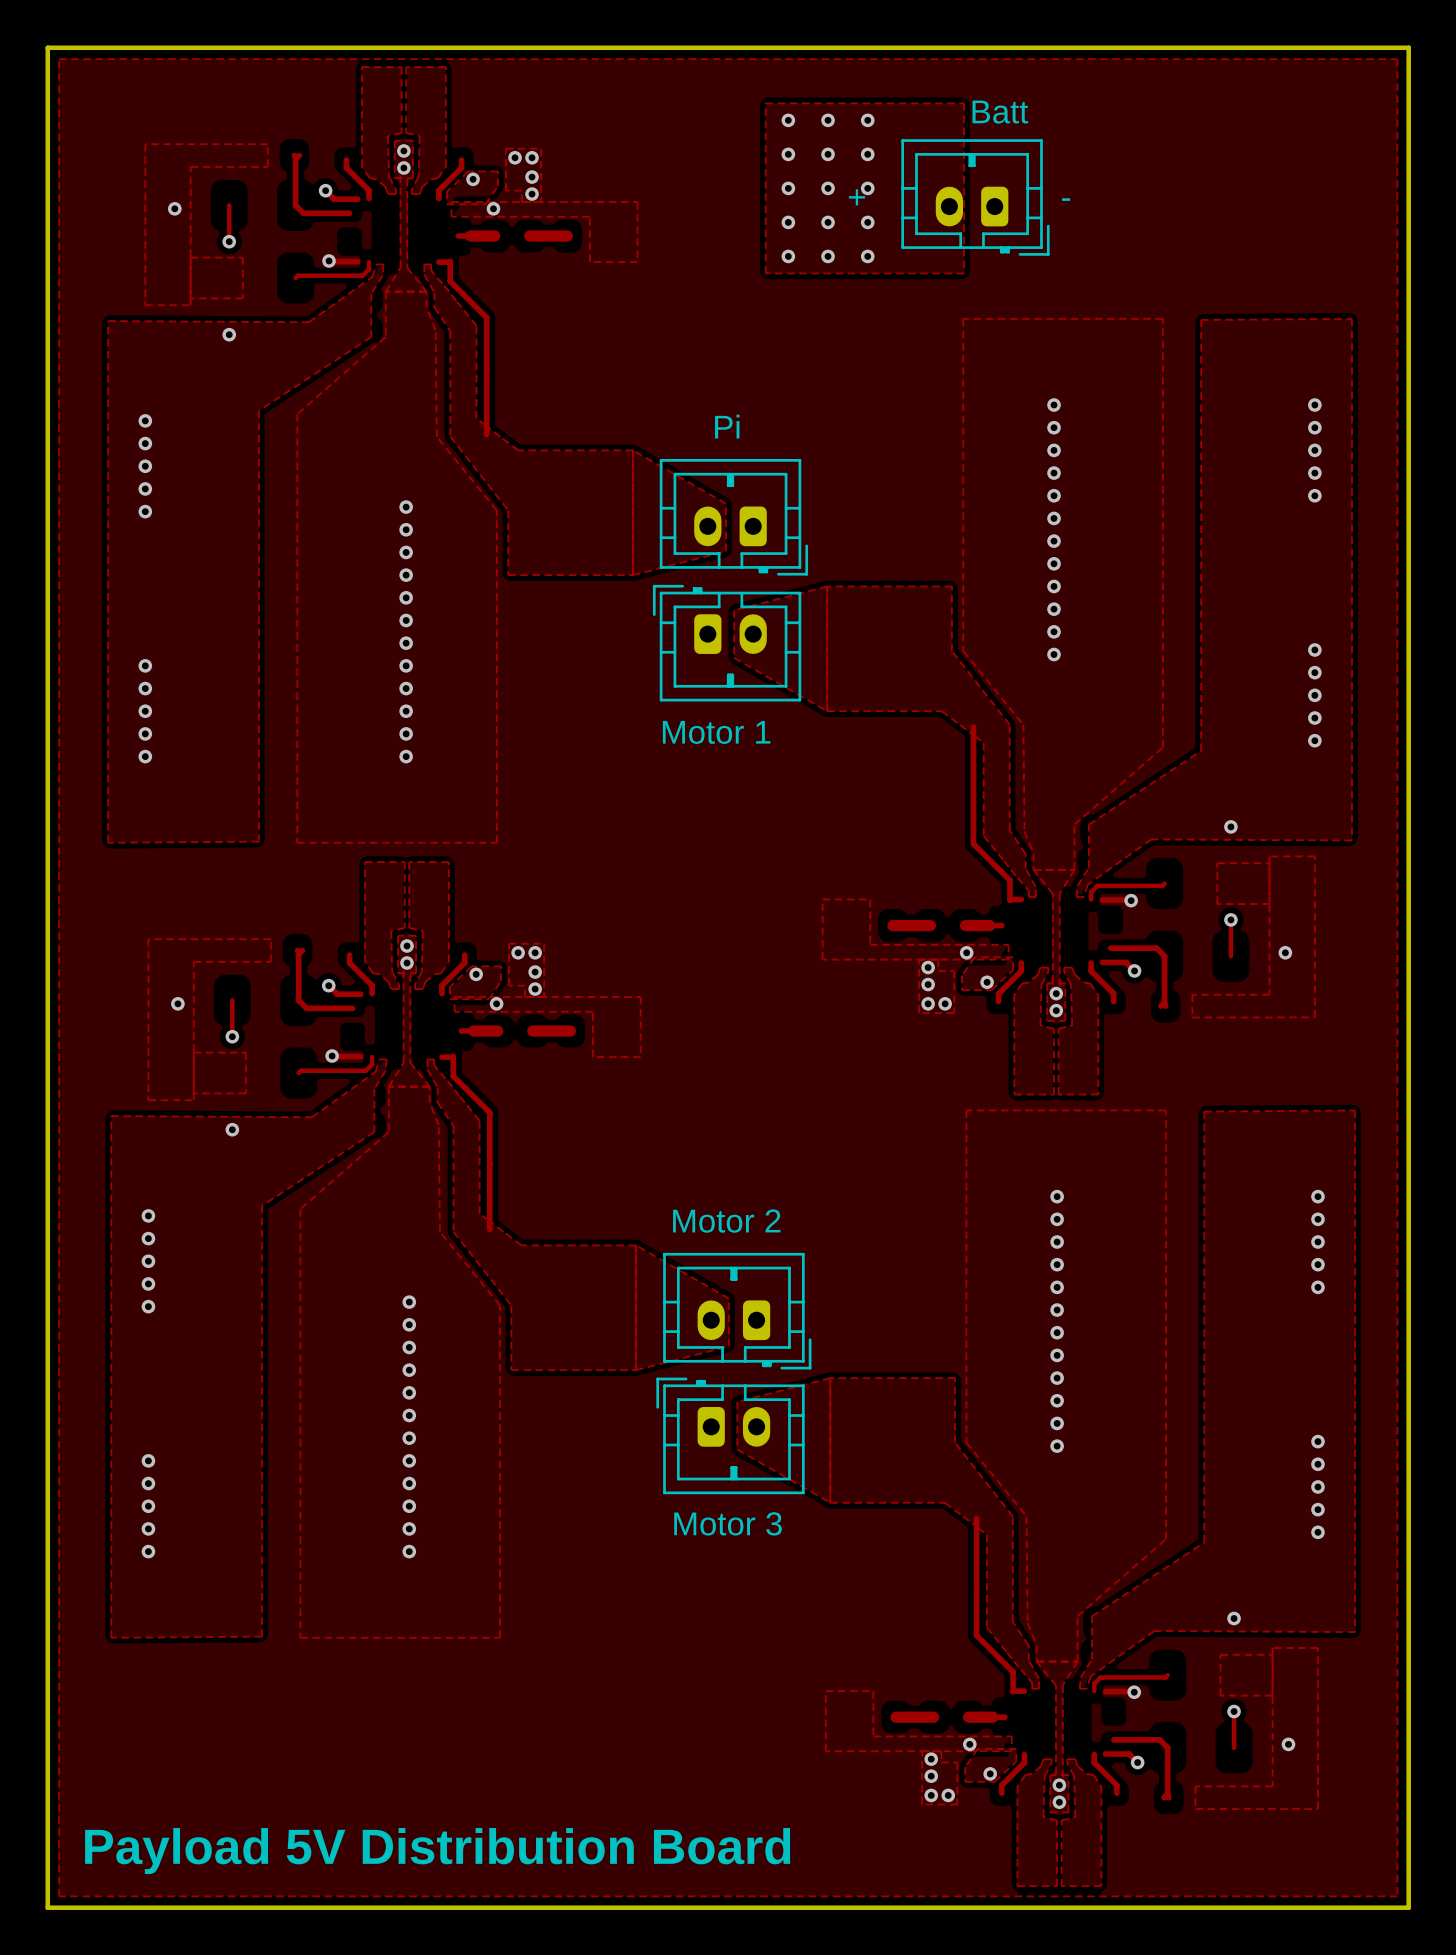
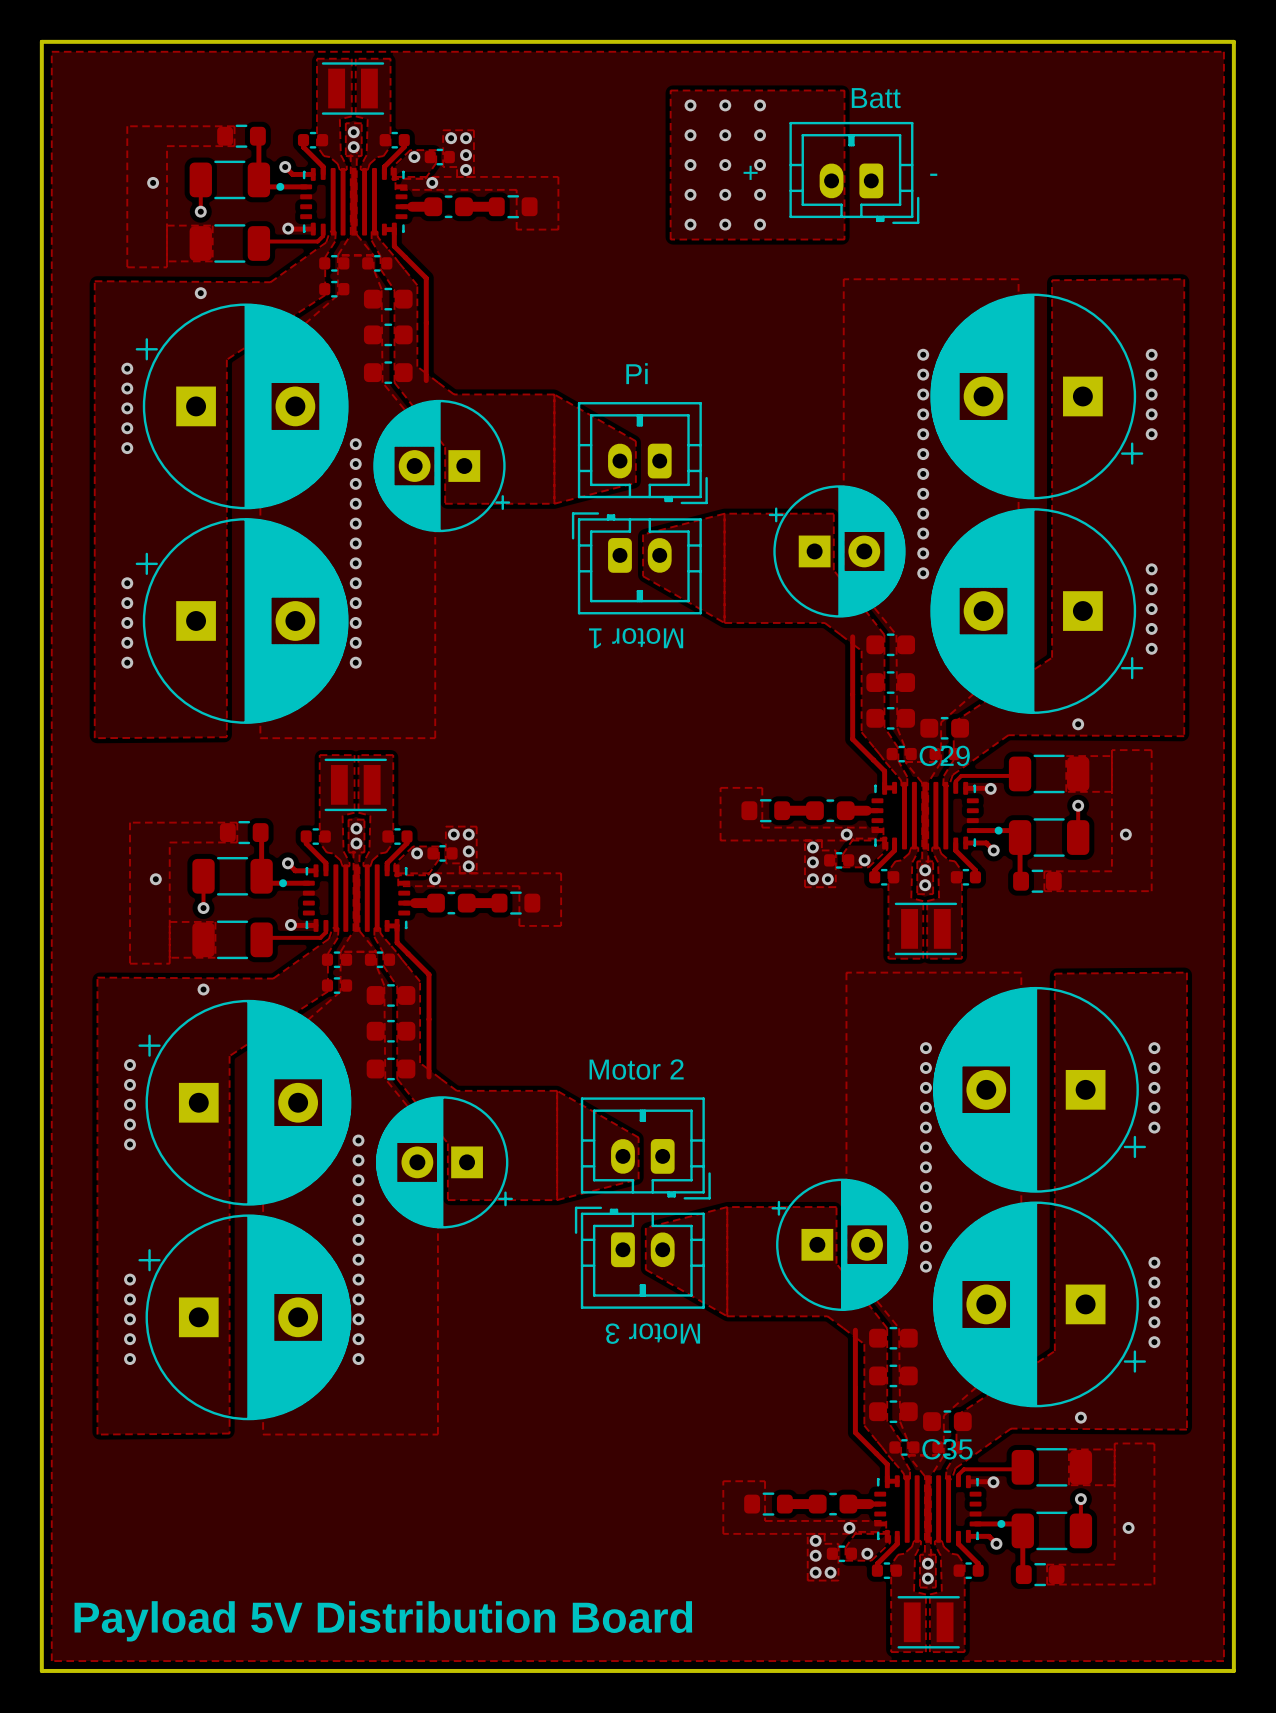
part: none -> (353, 88)
part: none -> (241, 136)
part: none -> (313, 140)
part: none -> (394, 140)
part: none -> (439, 157)
part: none -> (229, 179)
part: none -> (341, 201)
part: none -> (448, 206)
part: none -> (513, 206)
part: none -> (229, 243)
part: none -> (334, 263)
part: none -> (377, 263)
part: none -> (334, 289)
part: none -> (388, 299)
part: none -> (388, 334)
part: none -> (388, 372)
part: none -> (1036, 396)
part: none -> (242, 406)
part: none -> (441, 466)
part: none -> (837, 551)
part: none -> (1036, 611)
part: none -> (242, 620)
text rotation: 0° (716, 732) -> 180° (636, 638)
part: none -> (890, 644)
part: none -> (890, 682)
part: none -> (890, 718)
C29: none -> (944, 728)
part: none -> (901, 754)
part: none -> (944, 754)
part: none -> (1049, 773)
part: none -> (355, 784)
part: none -> (765, 810)
part: none -> (830, 810)
part: none -> (937, 815)
part: none -> (244, 832)
part: none -> (315, 836)
part: none -> (397, 836)
part: none -> (1049, 837)
part: none -> (442, 853)
part: none -> (839, 860)
part: none -> (232, 876)
part: none -> (884, 877)
part: none -> (965, 877)
part: none -> (1037, 881)
part: none -> (344, 898)
part: none -> (451, 903)
part: none -> (515, 903)
part: none -> (925, 928)
part: none -> (232, 939)
part: none -> (337, 959)
part: none -> (379, 959)
part: none -> (337, 985)
part: none -> (391, 995)
part: none -> (391, 1031)
part: none -> (391, 1068)
part: none -> (1039, 1089)
part: none -> (244, 1102)
part: none -> (444, 1162)
part: none -> (839, 1244)
part: none -> (1039, 1304)
part: none -> (244, 1317)
text rotation: 0° (728, 1523) -> 180° (652, 1333)
part: none -> (893, 1338)
part: none -> (893, 1375)
part: none -> (893, 1411)
C35: none -> (947, 1421)
part: none -> (904, 1447)
part: none -> (947, 1447)
part: none -> (1051, 1467)
part: none -> (768, 1504)
part: none -> (833, 1504)
part: none -> (939, 1509)
part: none -> (1051, 1530)
part: none -> (841, 1553)
part: none -> (886, 1570)
part: none -> (968, 1570)
part: none -> (1040, 1574)
part: none -> (928, 1622)

